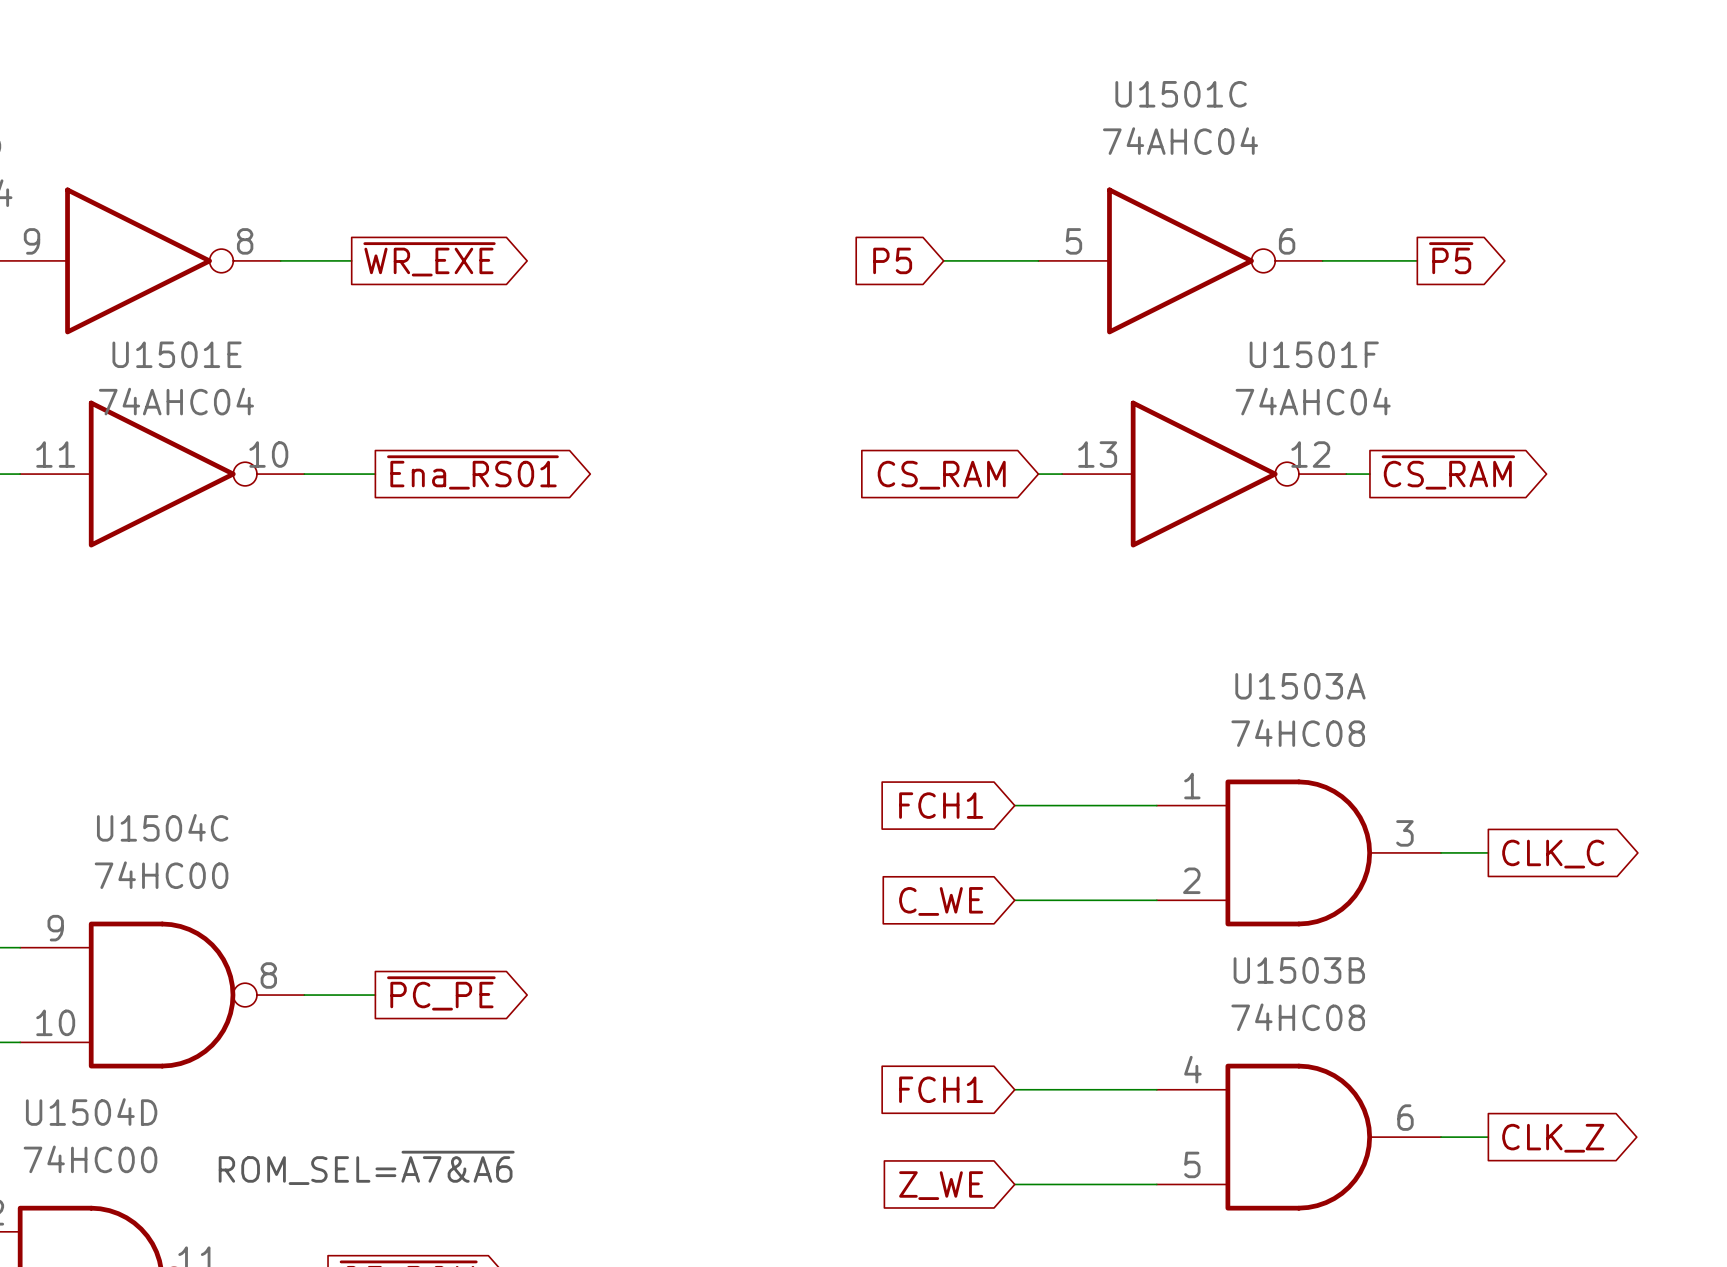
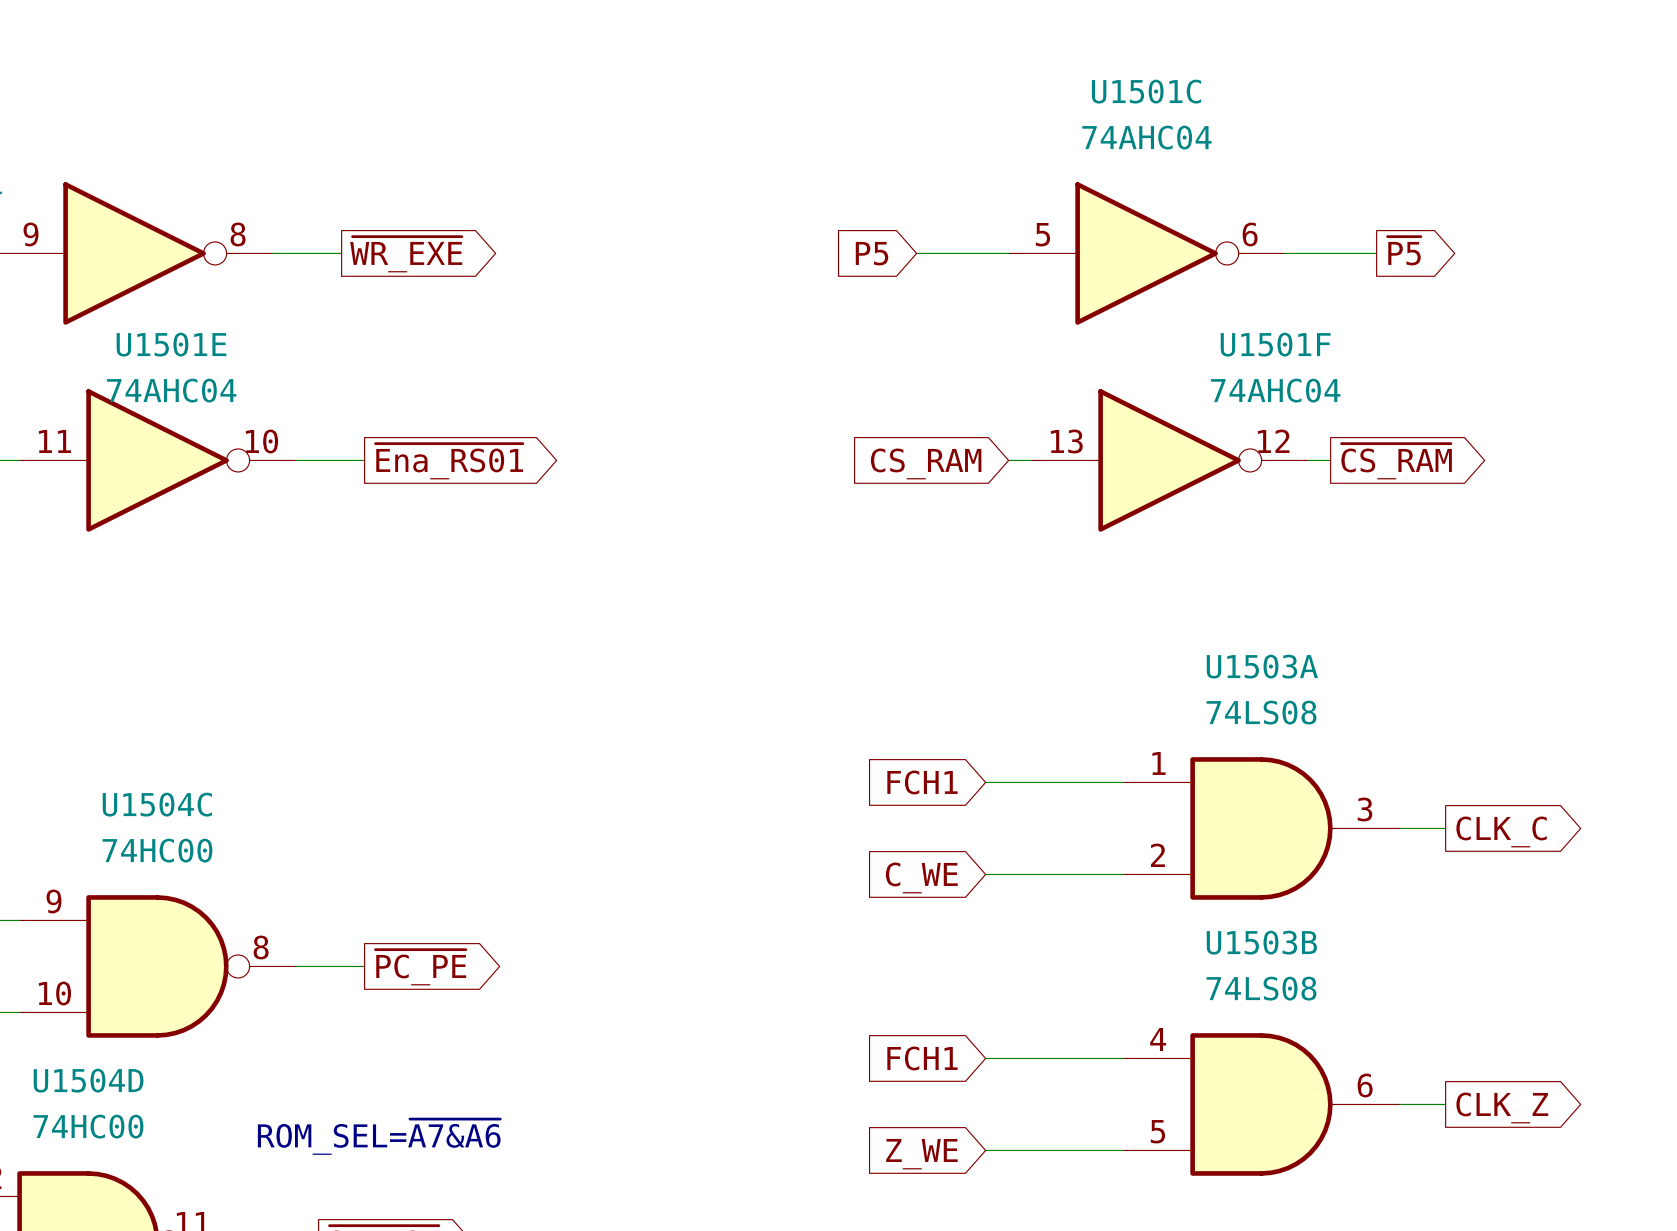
U1503A value: 74HC08 (1298, 733) -> 74LS08 (1261, 712)
U1503B value: 74HC08 (1298, 1017) -> 74LS08 (1261, 988)

